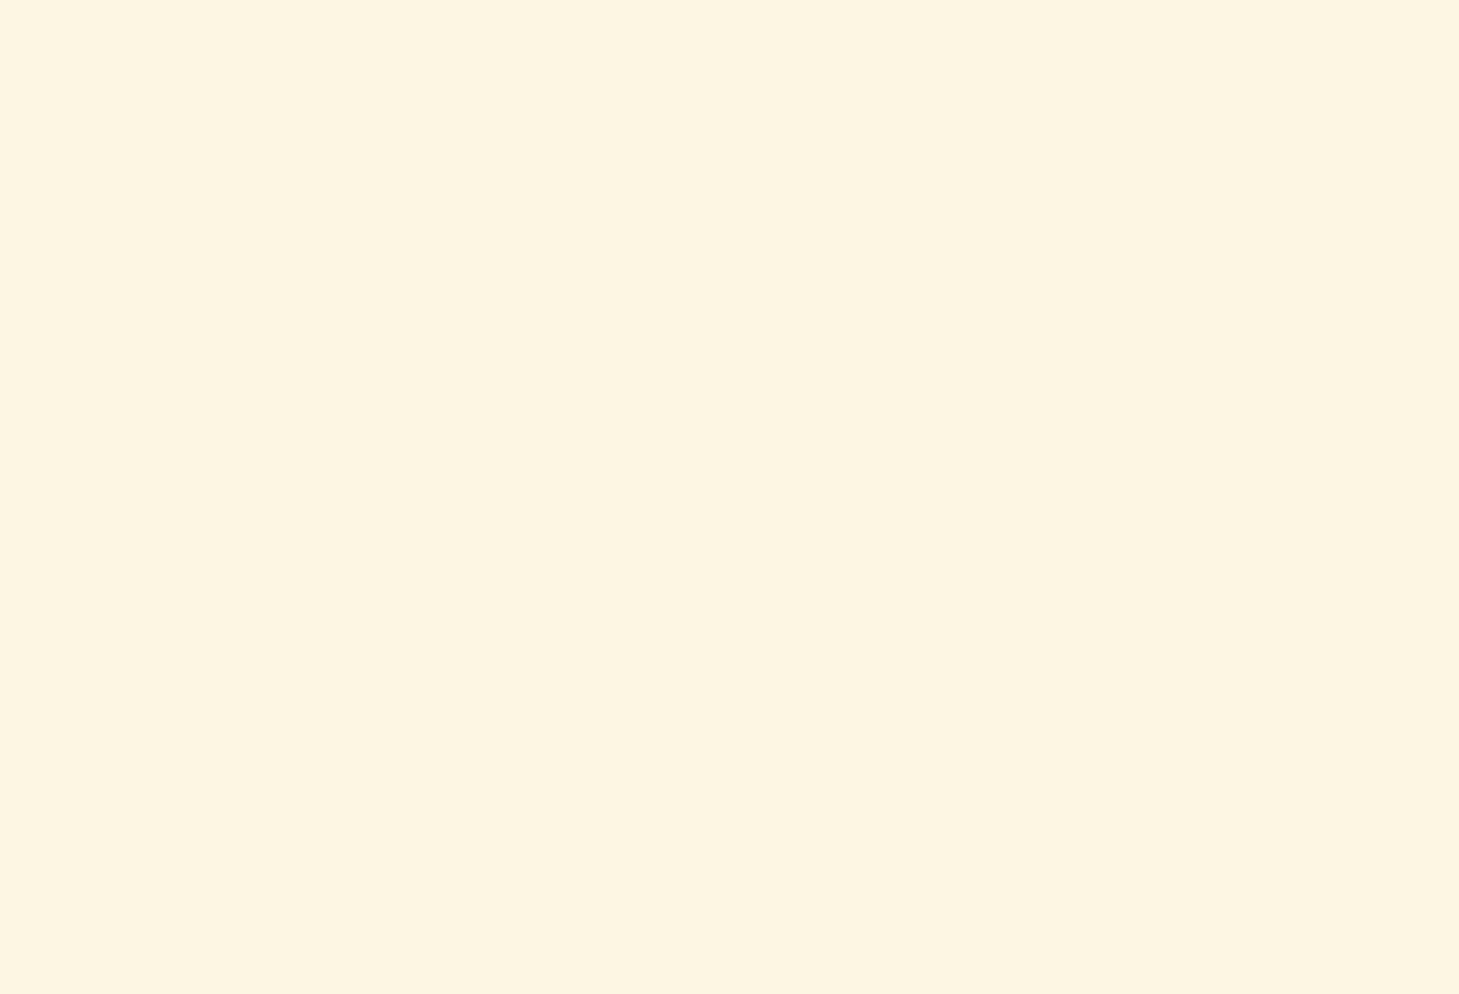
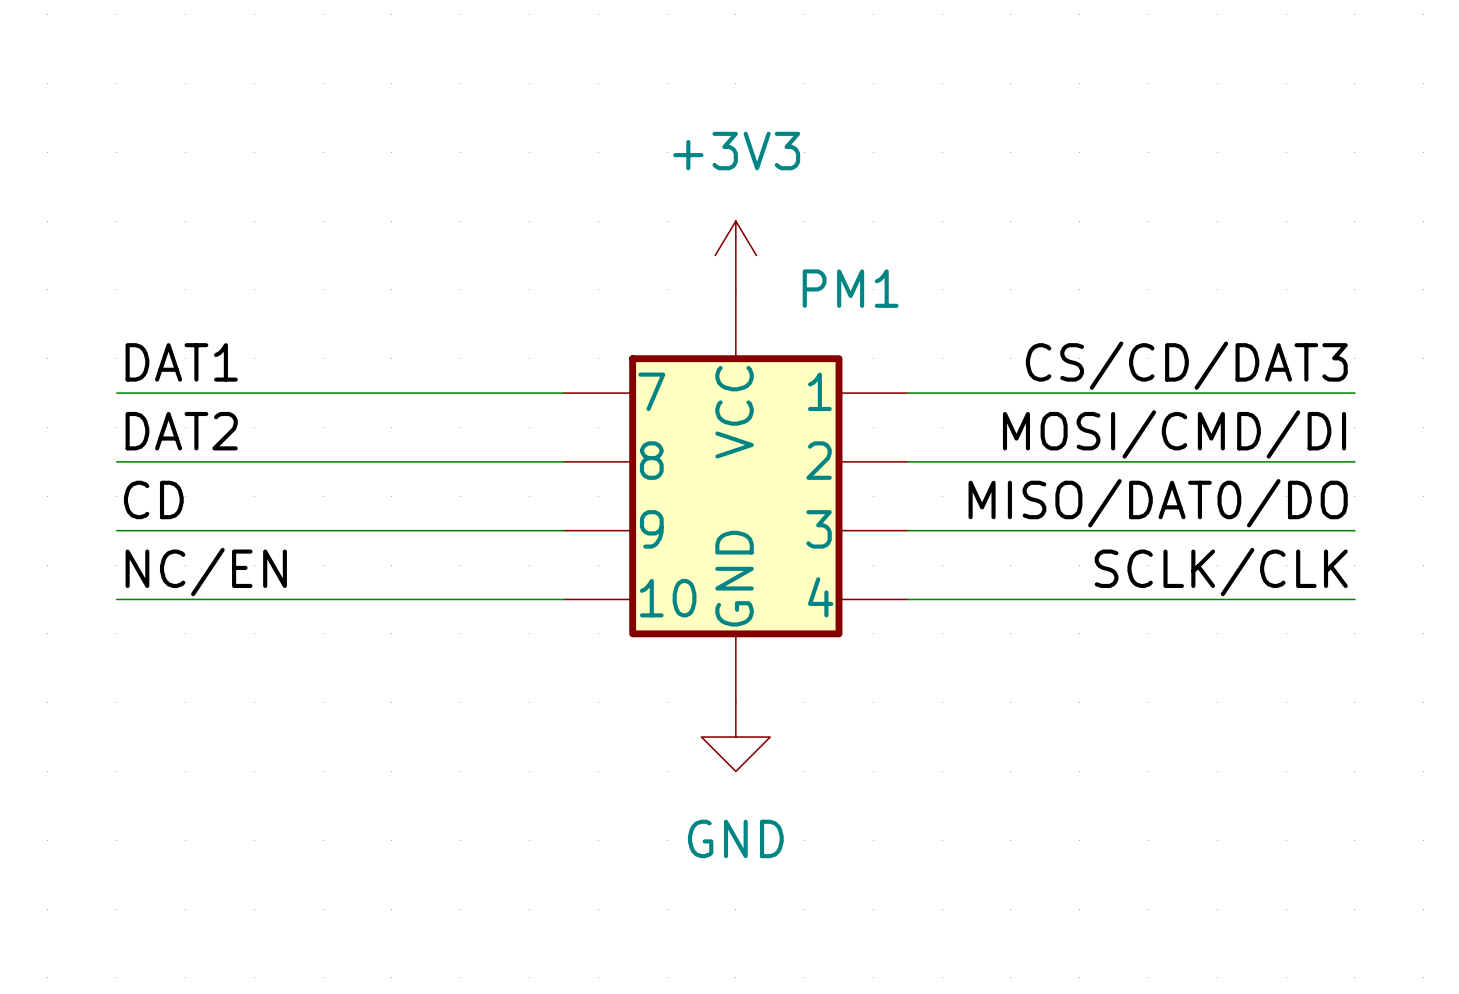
power symbol: none -> +3V3 (735, 255)
label: none -> DAT1 (181, 362)
label: none -> CS/CD/DAT3 (1186, 365)
wire: none -> (116, 393) (563, 393)
wire: none -> (907, 393) (1354, 393)
label: none -> DAT2 (181, 431)
label: none -> MOSI/CMD/DI (1174, 434)
wire: none -> (116, 461) (563, 461)
wire: none -> (907, 461) (1354, 461)
PM1: none -> (735, 496)
label: none -> CD (153, 499)
label: none -> MISO/DAT0/DO (1158, 503)
wire: none -> (116, 530) (563, 530)
wire: none -> (907, 530) (1354, 530)
label: none -> NC/EN (206, 572)
label: none -> SCLK/CLK (1221, 572)
wire: none -> (116, 599) (563, 599)
wire: none -> (907, 599) (1354, 599)
power symbol: none -> GND (735, 737)

